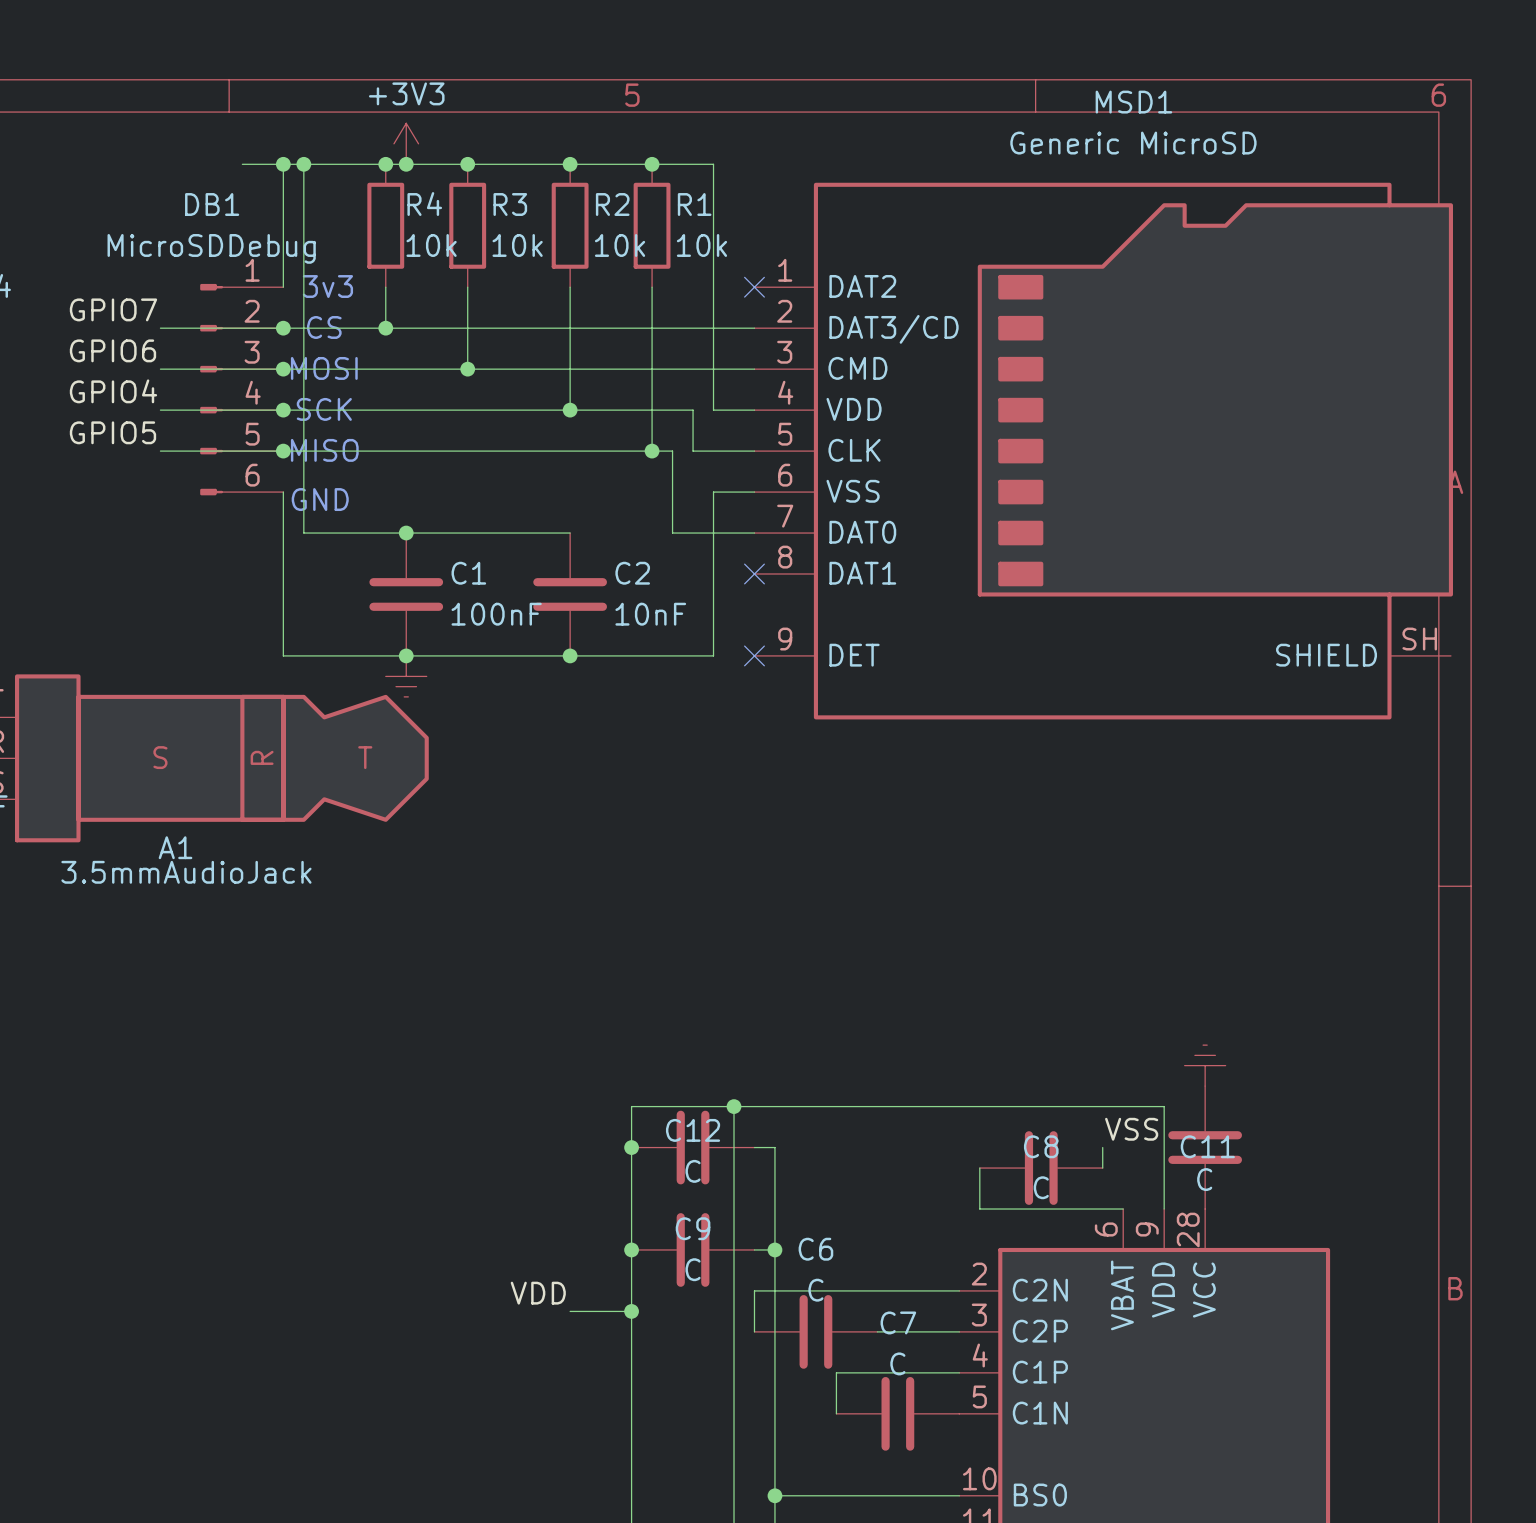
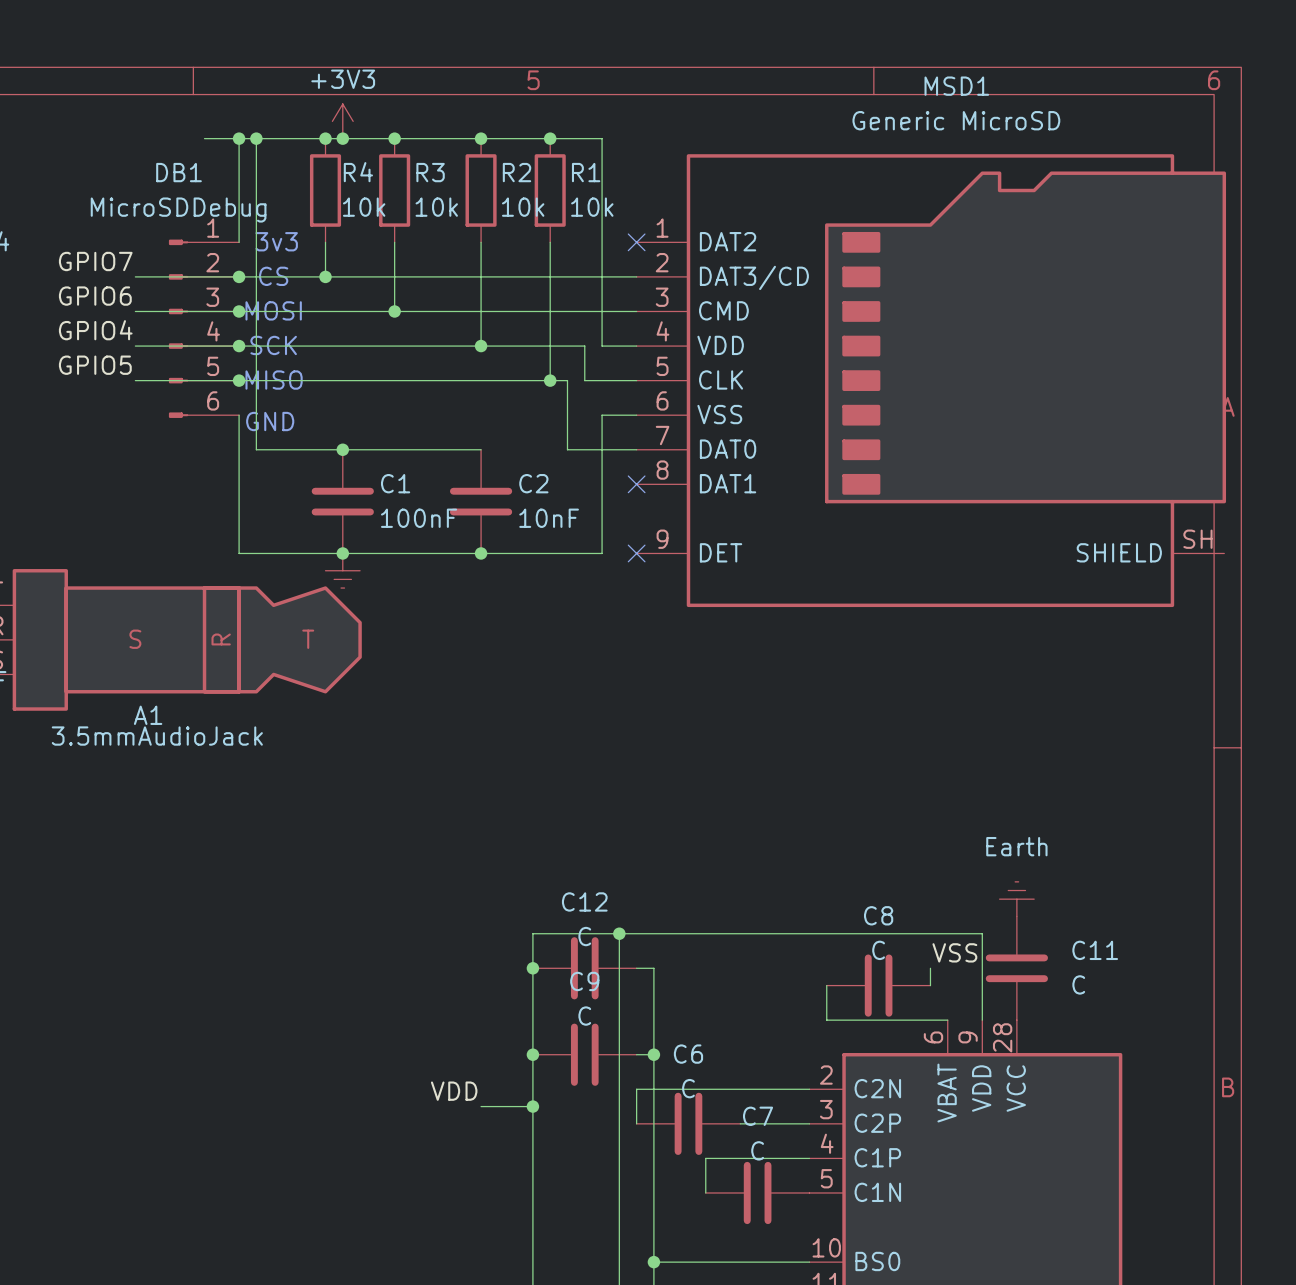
power symbol text: none -> Earth (1016, 846)
C12 name position: C12 (693, 1130) -> C12 (584, 901)
C8 name position: C8 (1041, 1146) -> C8 (878, 915)
C11 name position: C11 (1207, 1146) -> C11 (1095, 950)
C12 value position: C (693, 1171) -> C (584, 936)
C11 value position: C (1204, 1179) -> C (1078, 984)
C8 value position: C (1041, 1187) -> C (878, 950)
C9 name position: C9 (693, 1228) -> C9 (584, 981)
C9 value position: C (693, 1269) -> C (584, 1016)

